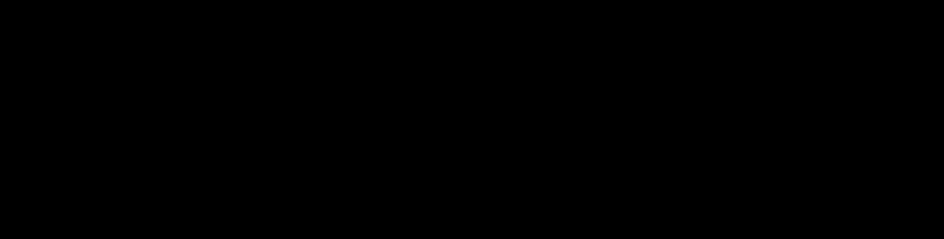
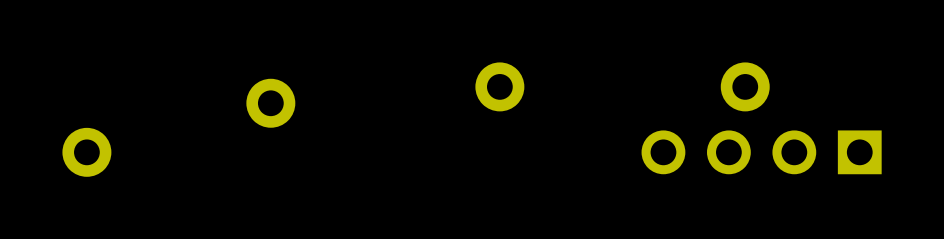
part: none -> (499, 86)
part: none -> (745, 86)
part: none -> (270, 103)
part: none -> (86, 152)
part: none -> (761, 152)

